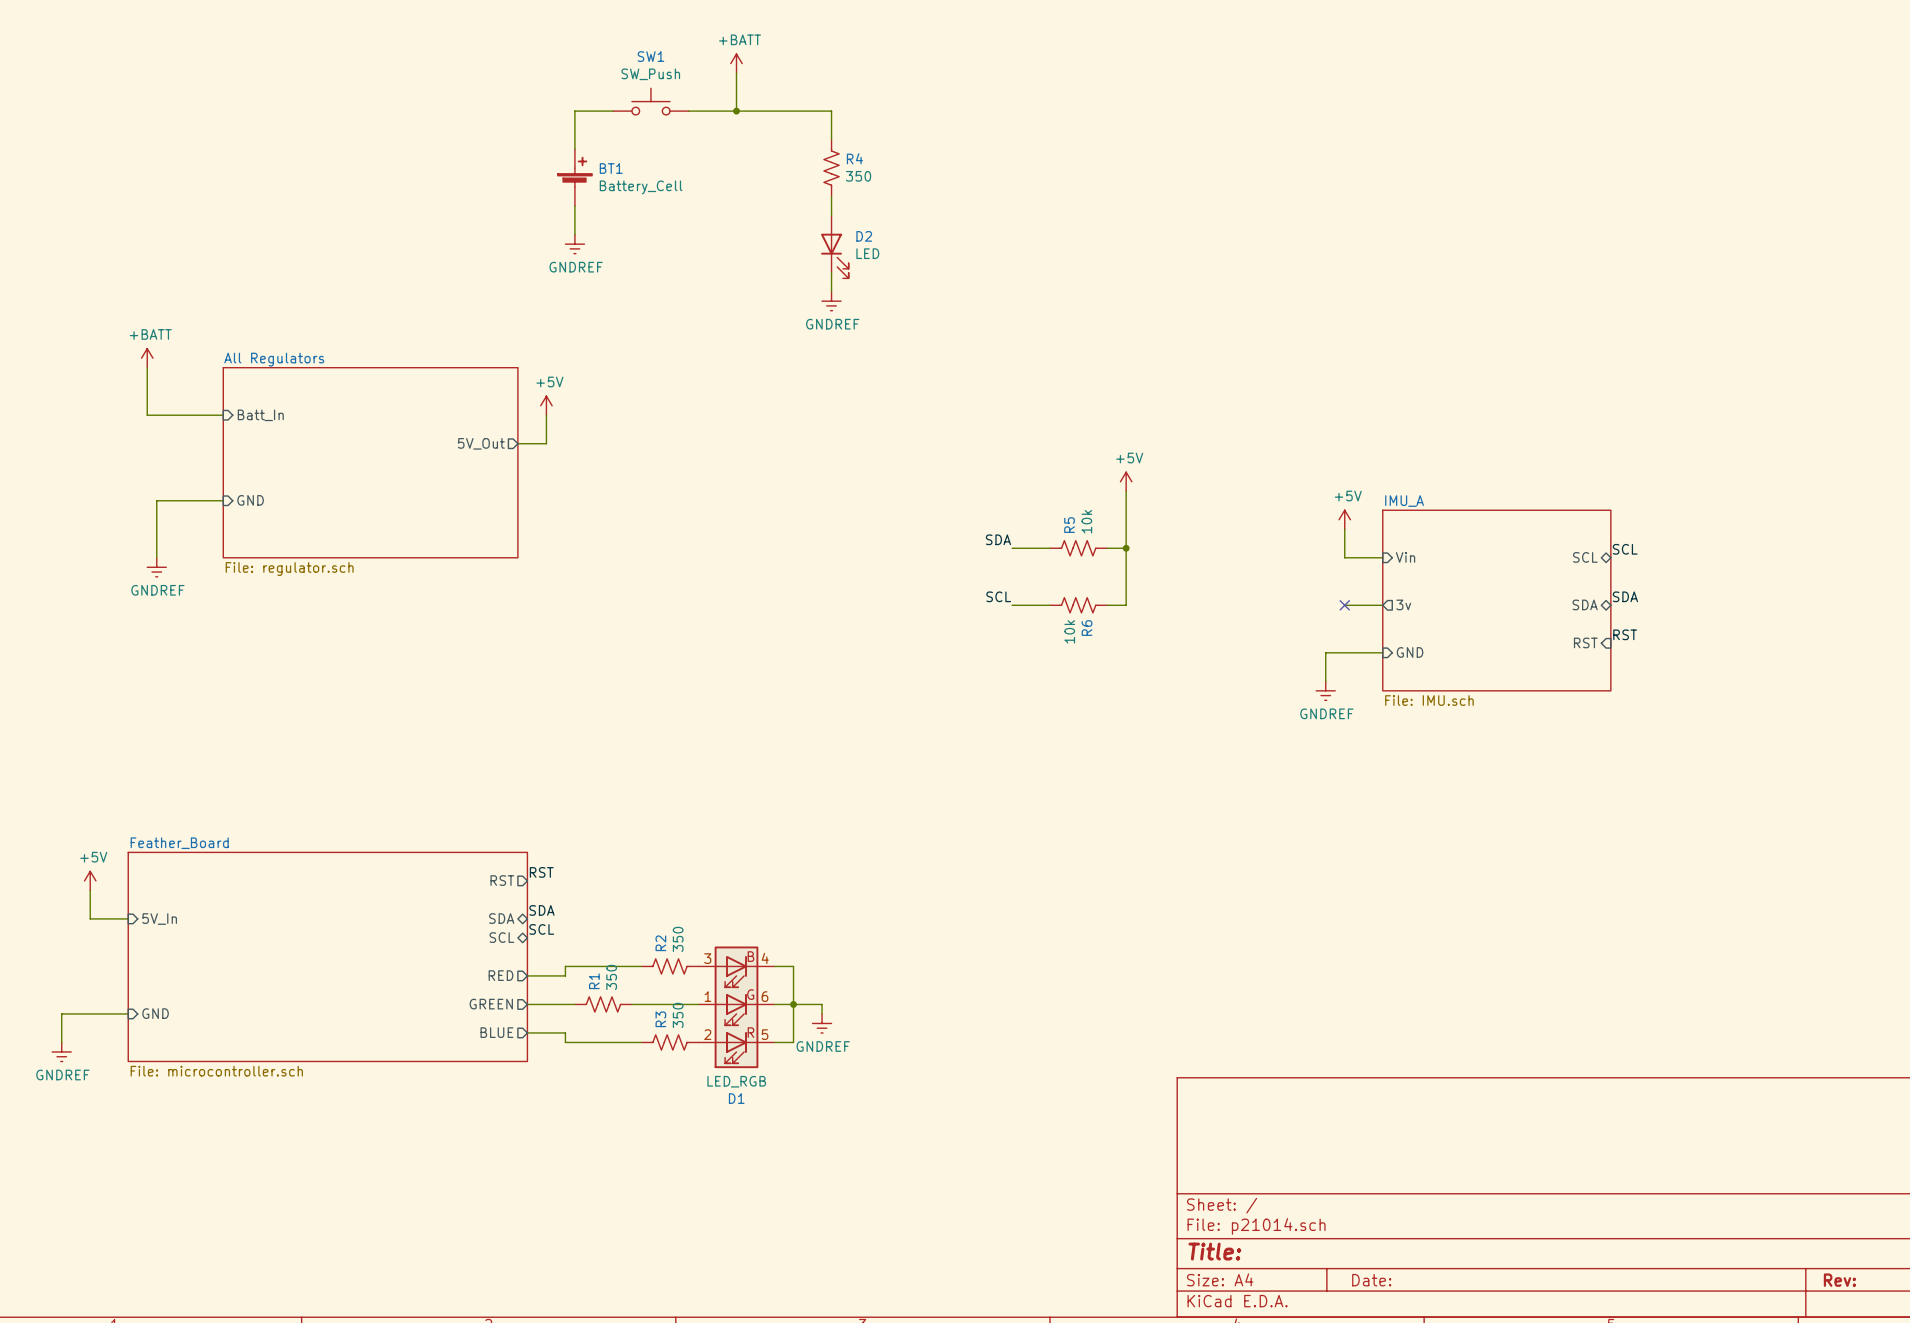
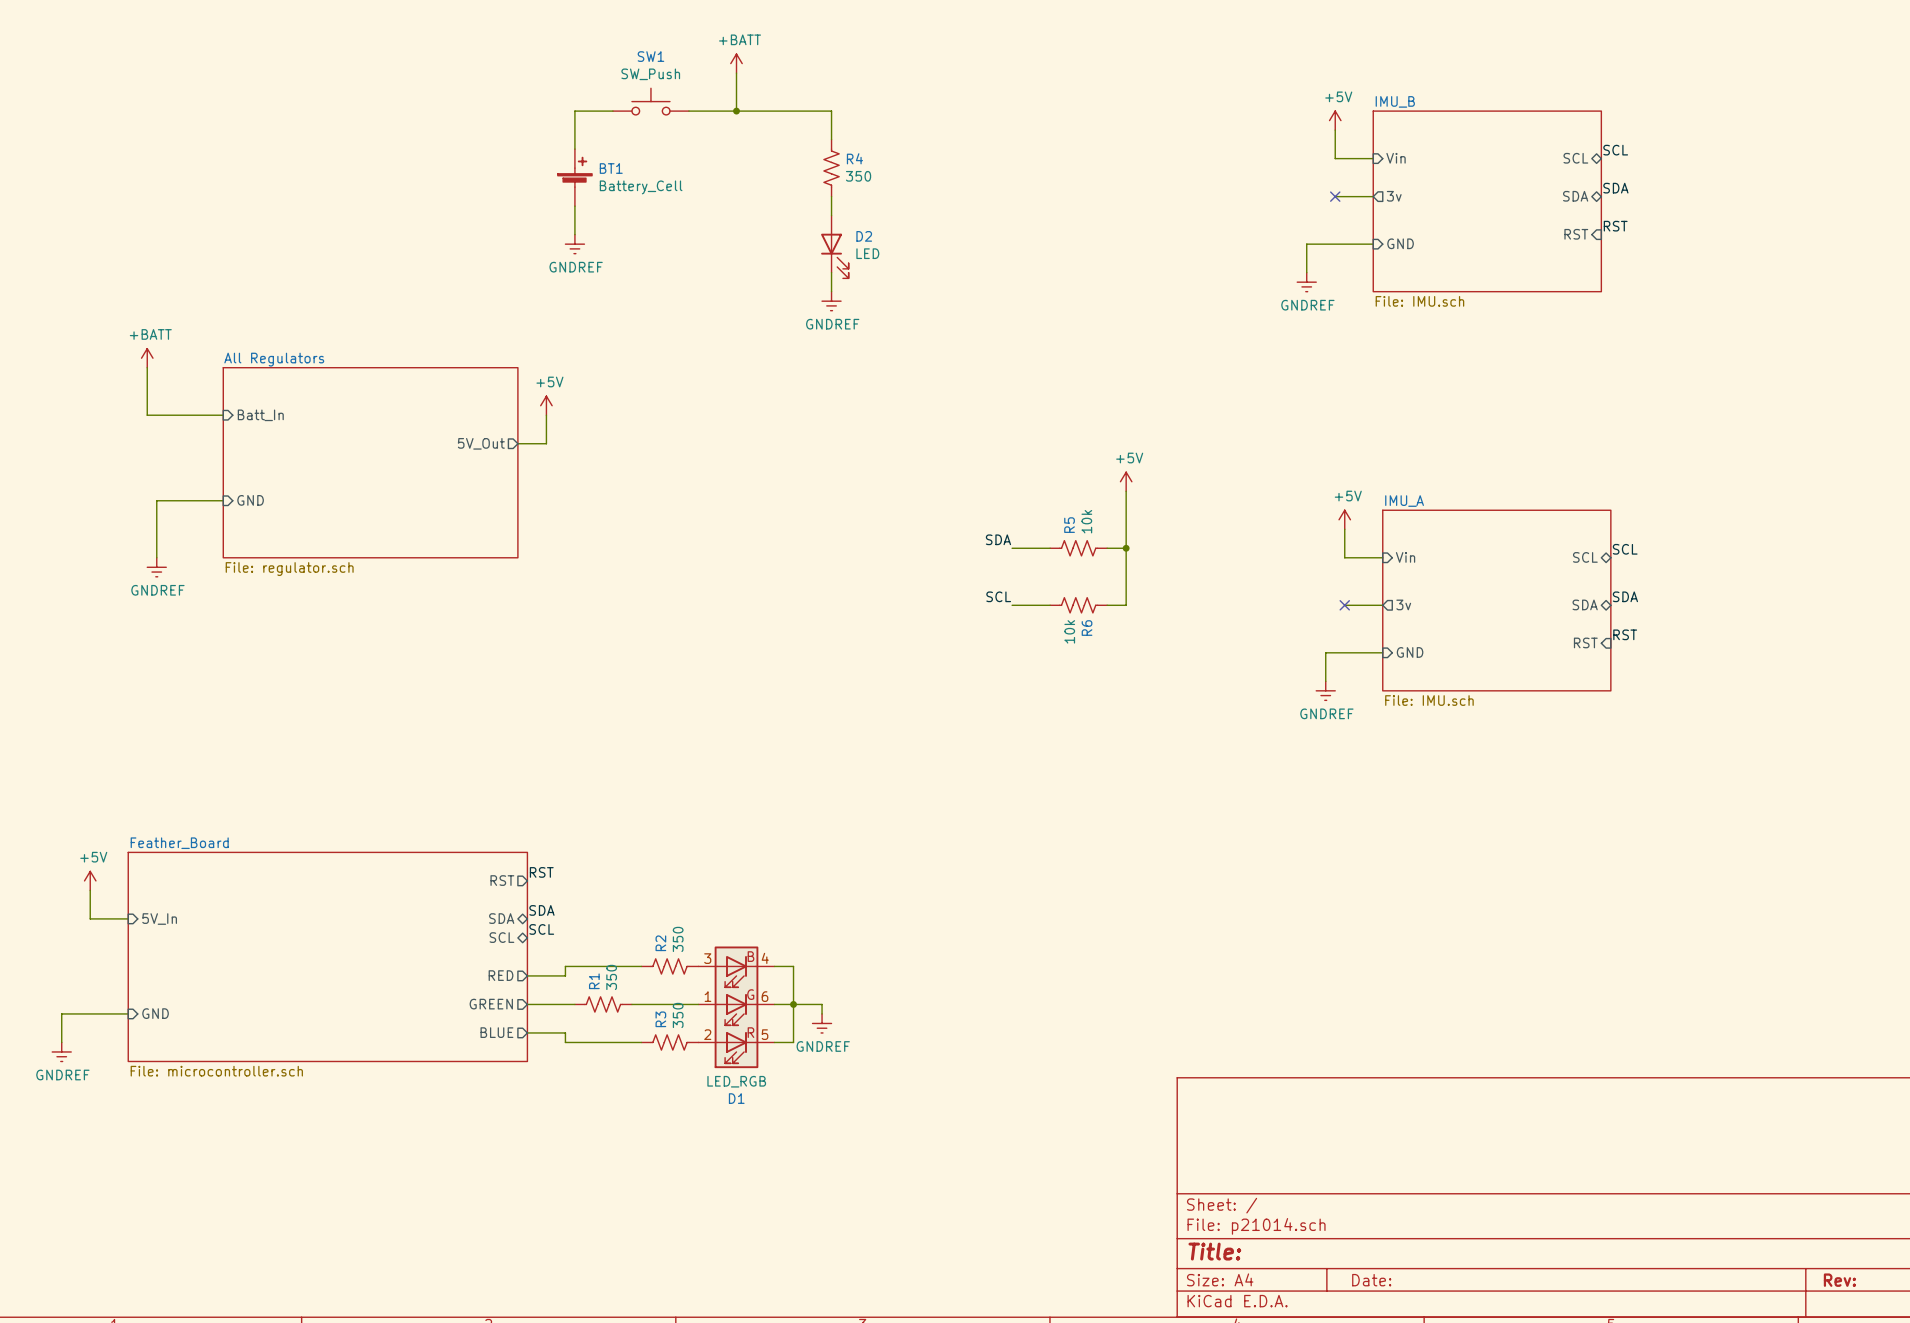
power symbol: none -> +5V (1335, 120)
wire: none -> (1335, 130) (1335, 158) (1373, 158)
label: none -> SCL (1615, 150)
sheet pin: none -> Vin (1396, 158)
sheet pin: none -> SCL (1575, 158)
label: none -> SDA (1615, 188)
wire: none -> (1335, 196) (1373, 196)
no-connect mark: none -> (1335, 196)
sheet pin: none -> 3v (1394, 196)
sheet pin: none -> SDA (1575, 196)
sheet IMU_B: none -> File: IMU.sch (1487, 201)
label: none -> RST (1615, 226)
sheet pin: none -> RST (1576, 234)
sheet pin: none -> GND (1400, 243)
wire: none -> (1373, 244) (1306, 244) (1306, 272)
power symbol: none -> GNDREF (1306, 282)

